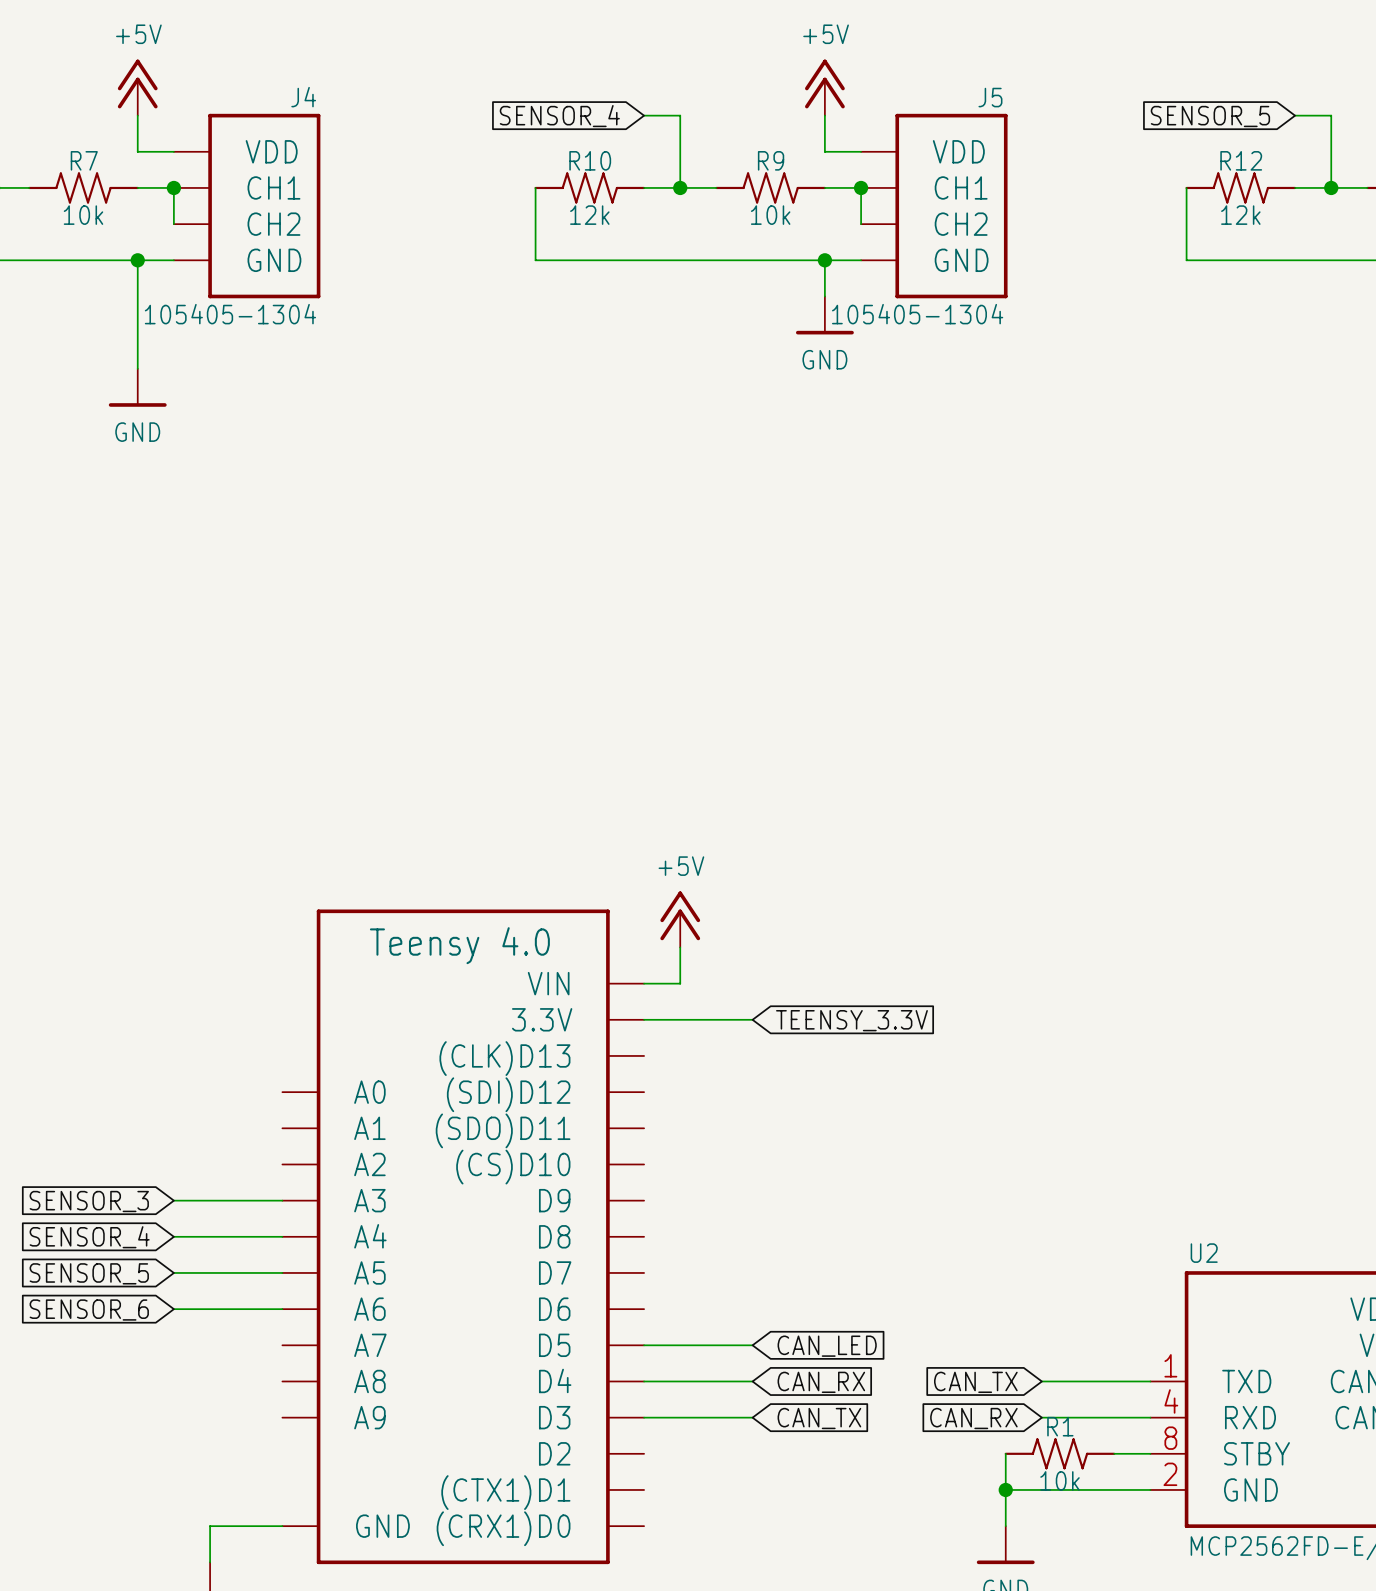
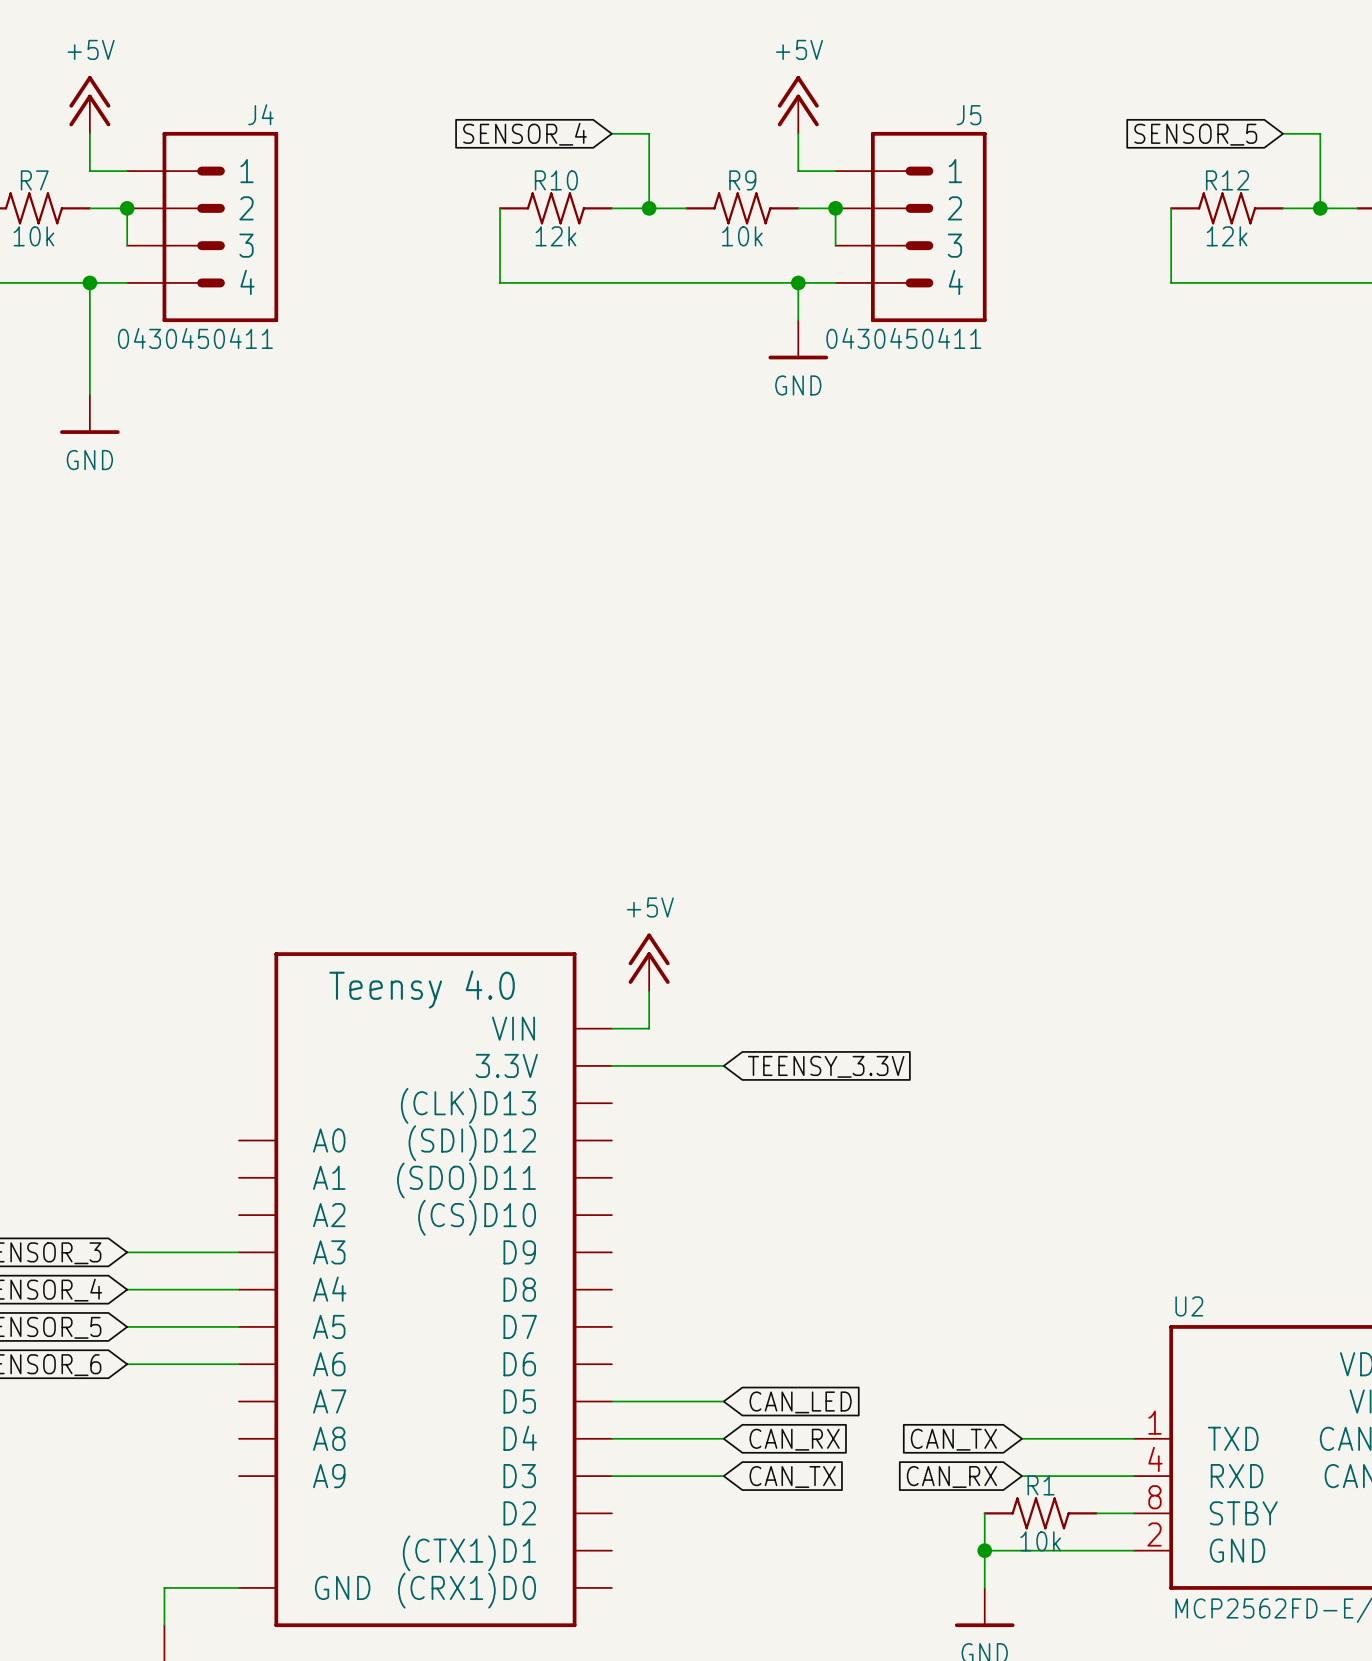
J4 symbol: [173, 113, 321, 299] -> [127, 131, 279, 323]
J5 symbol: [861, 113, 1008, 299] -> [835, 131, 987, 323]
J4 text: 105405-1304 (230, 314) -> 0430450411 (195, 338)
J5 text: 105405-1304 (917, 314) -> 0430450411 (903, 338)

